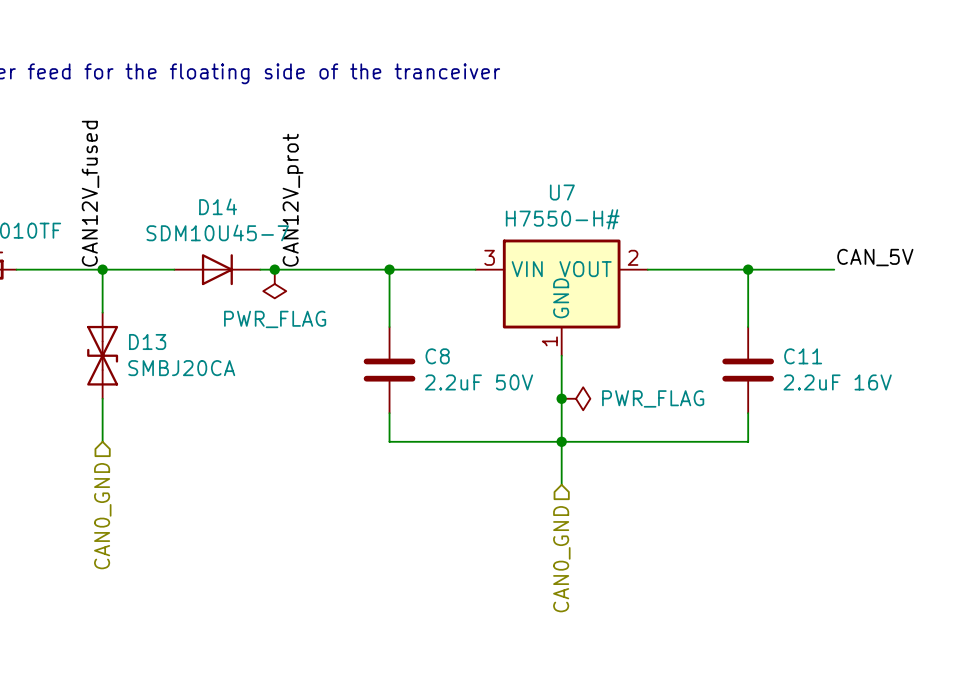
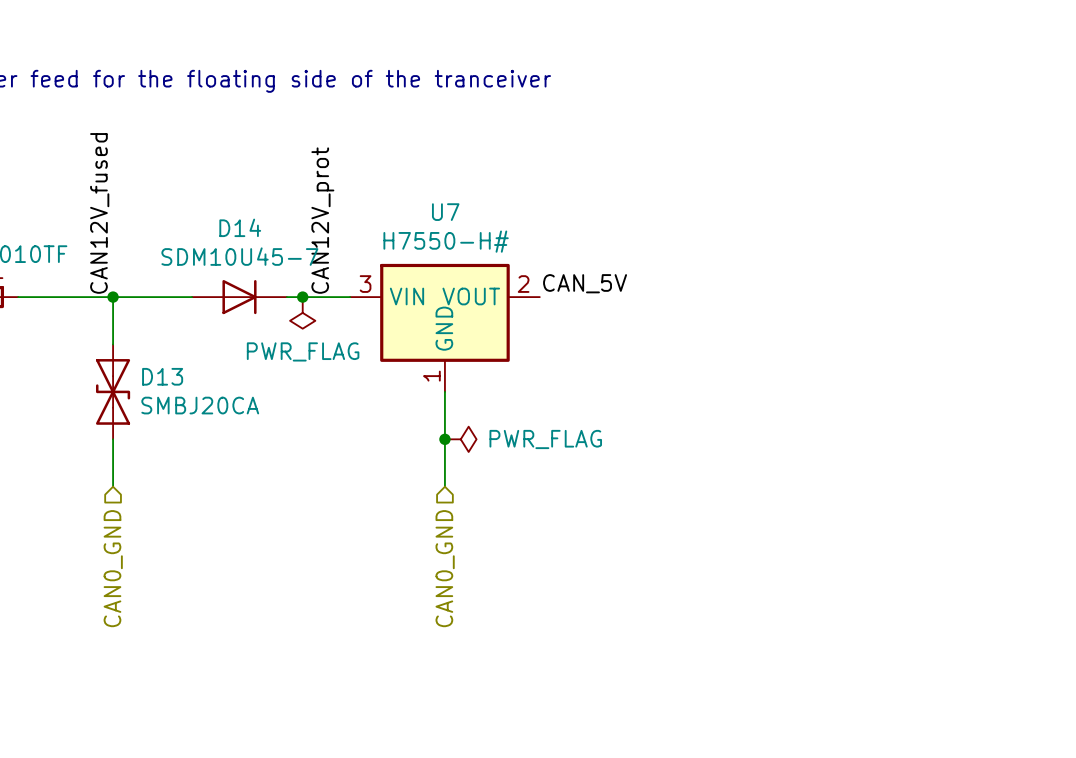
label: none -> CAN_5V (585, 283)
label: CAN_5V (875, 257) -> none
junction: (389, 269) -> none
wire: (647, 269) (834, 269) -> none
wire: (748, 269) (748, 327) -> none
junction: (748, 269) -> none
U7 position: (561, 297) -> (444, 327)
wire: none -> (444, 391) (444, 486)
wire: (561, 355) (561, 484) -> none
C8: 2.2uF 50V (389, 370) -> none
C11: 2.2uF 16V (748, 370) -> none
junction: none -> (444, 439)
junction: (561, 398) -> none
power symbol position: PWR_FLAG (576, 398) -> PWR_FLAG (460, 439)
wire: (389, 413) (389, 441) (748, 441) (748, 413) -> none
junction: (561, 441) -> none
hierarchical label position: CAN0_GND (561, 559) -> CAN0_GND (445, 568)

